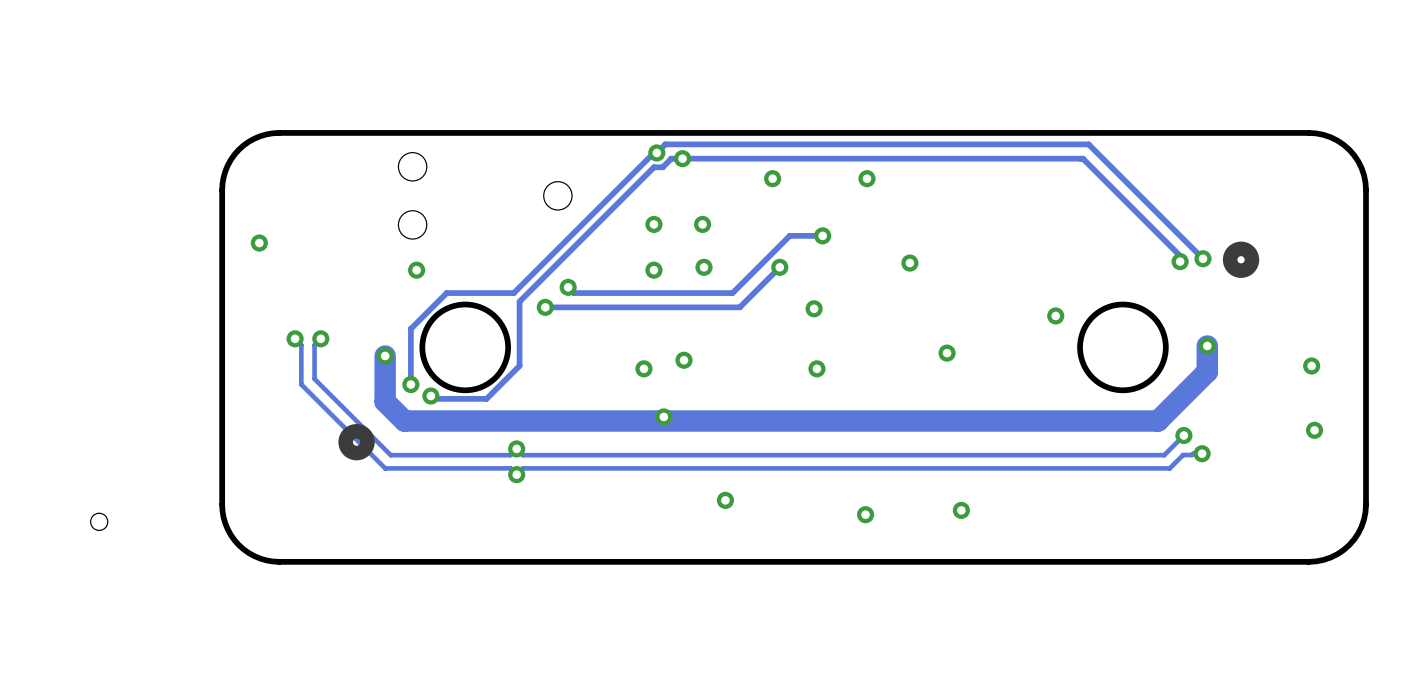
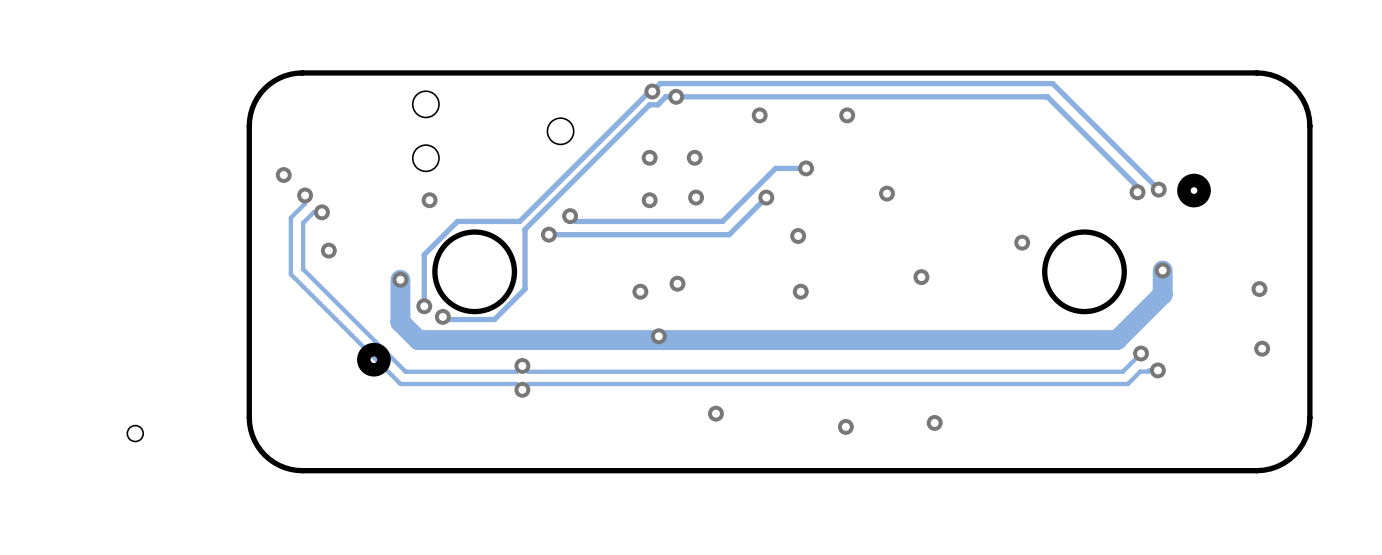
via: none -> (305, 195)
via: none -> (321, 212)
via: none -> (328, 250)
track: (295, 338) (301, 345) (301, 384) -> (305, 195) (305, 203) (290, 217) (290, 274) (322, 306)
via: (295, 338) -> none
track: (320, 338) (314, 345) (314, 378) -> (321, 212) (313, 212) (303, 222) (303, 269) (334, 301)
via: (320, 338) -> none

